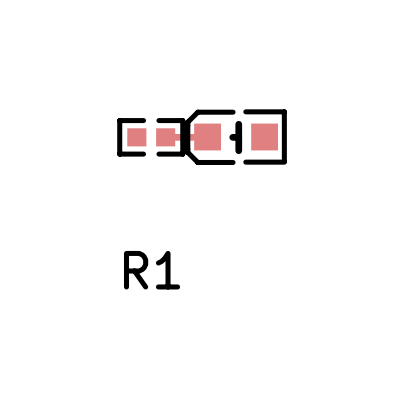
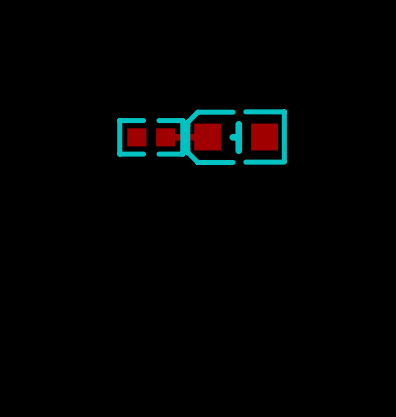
R1 name: R1 (152, 270) -> none

